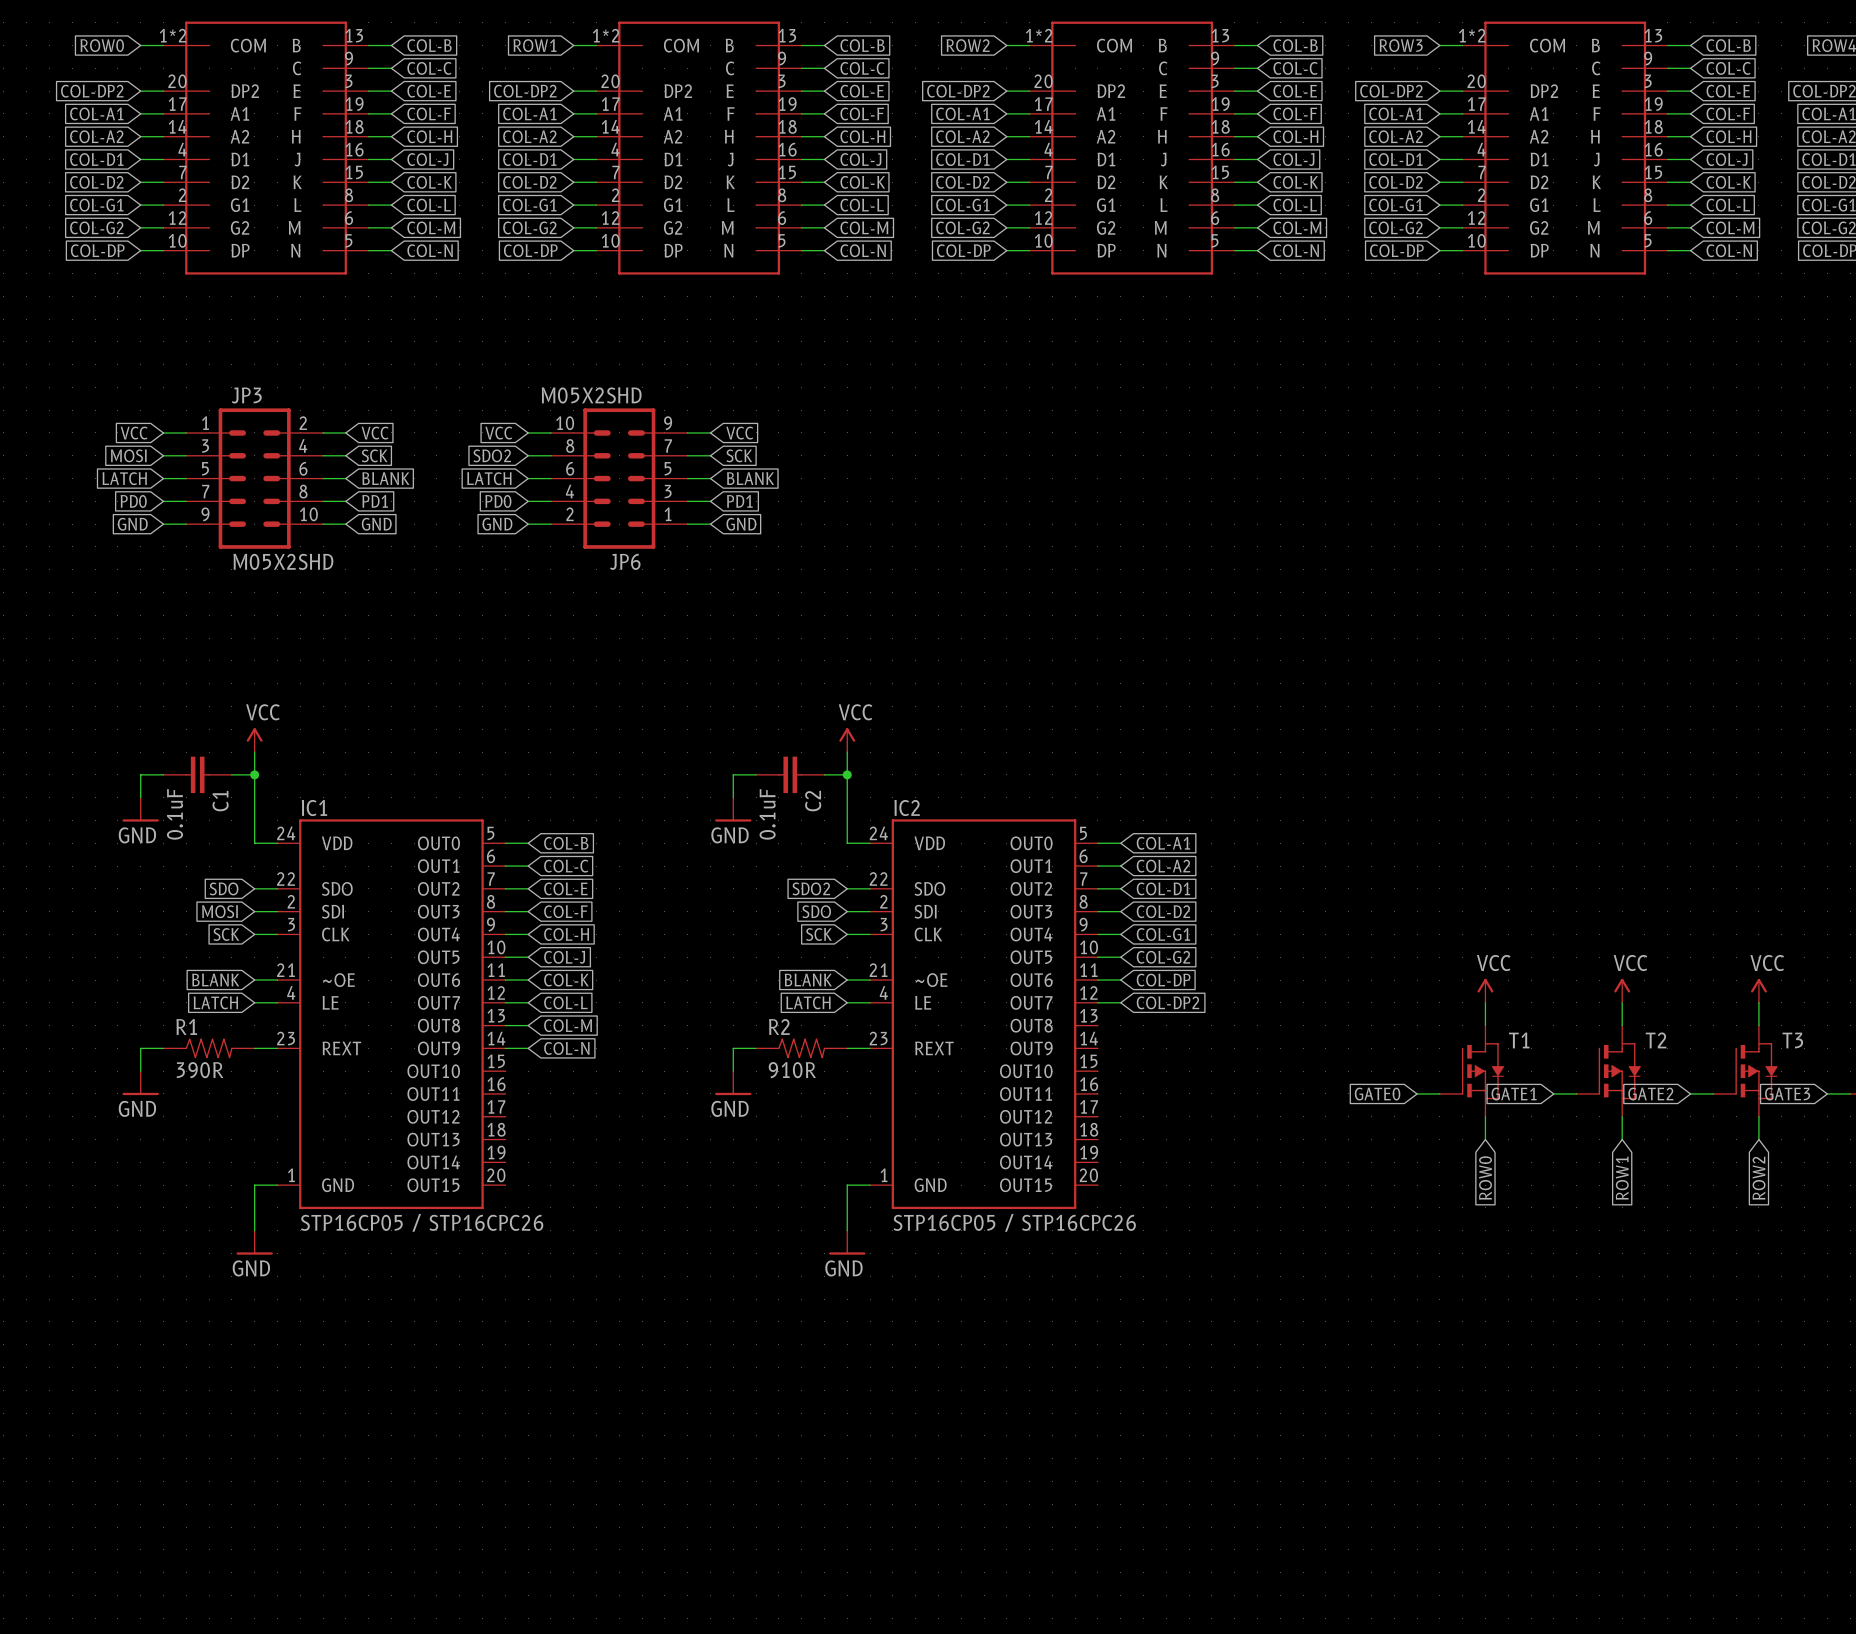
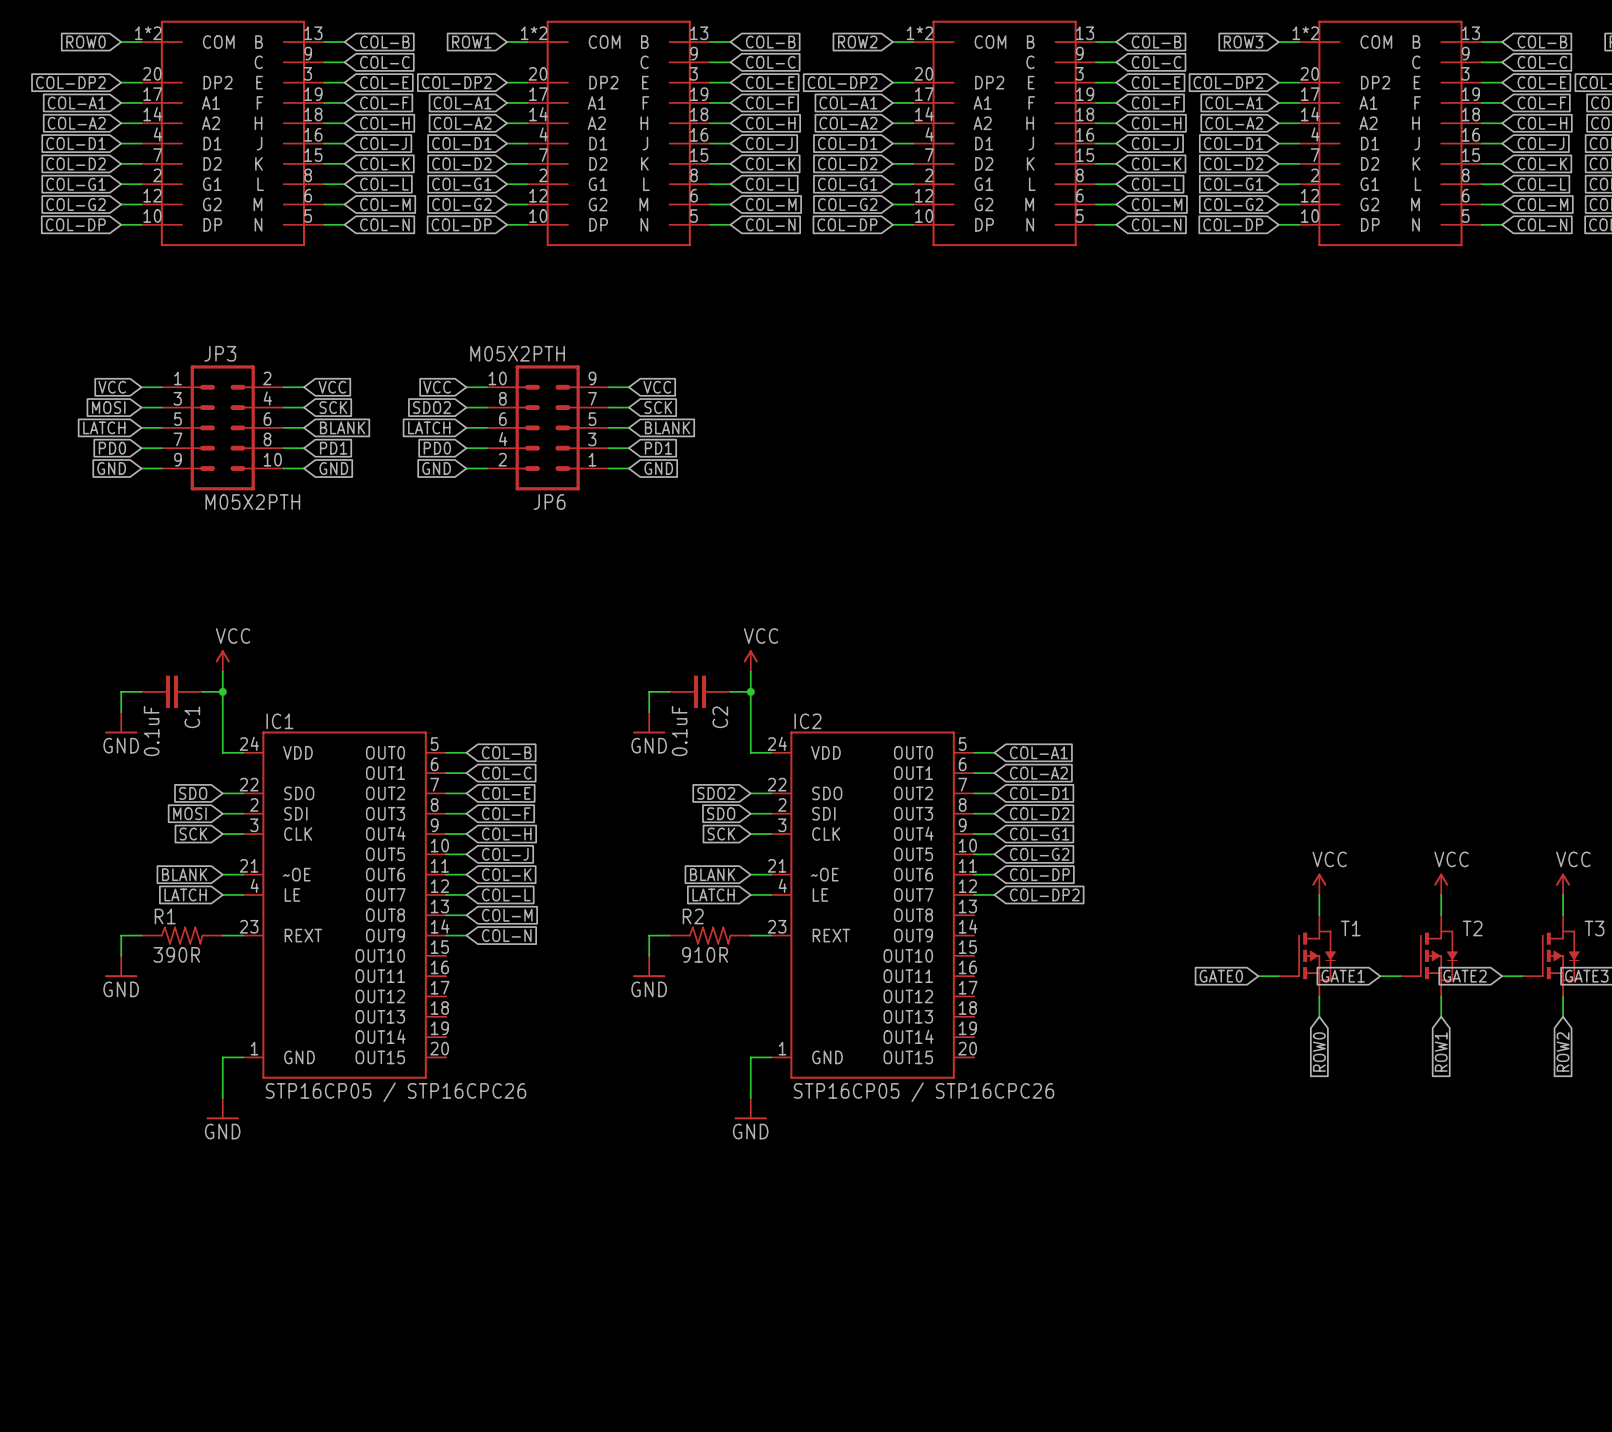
JP6 value: M05X2SHD (591, 395) -> M05X2PTH (517, 353)
JP3 value: M05X2SHD (283, 561) -> M05X2PTH (252, 502)

